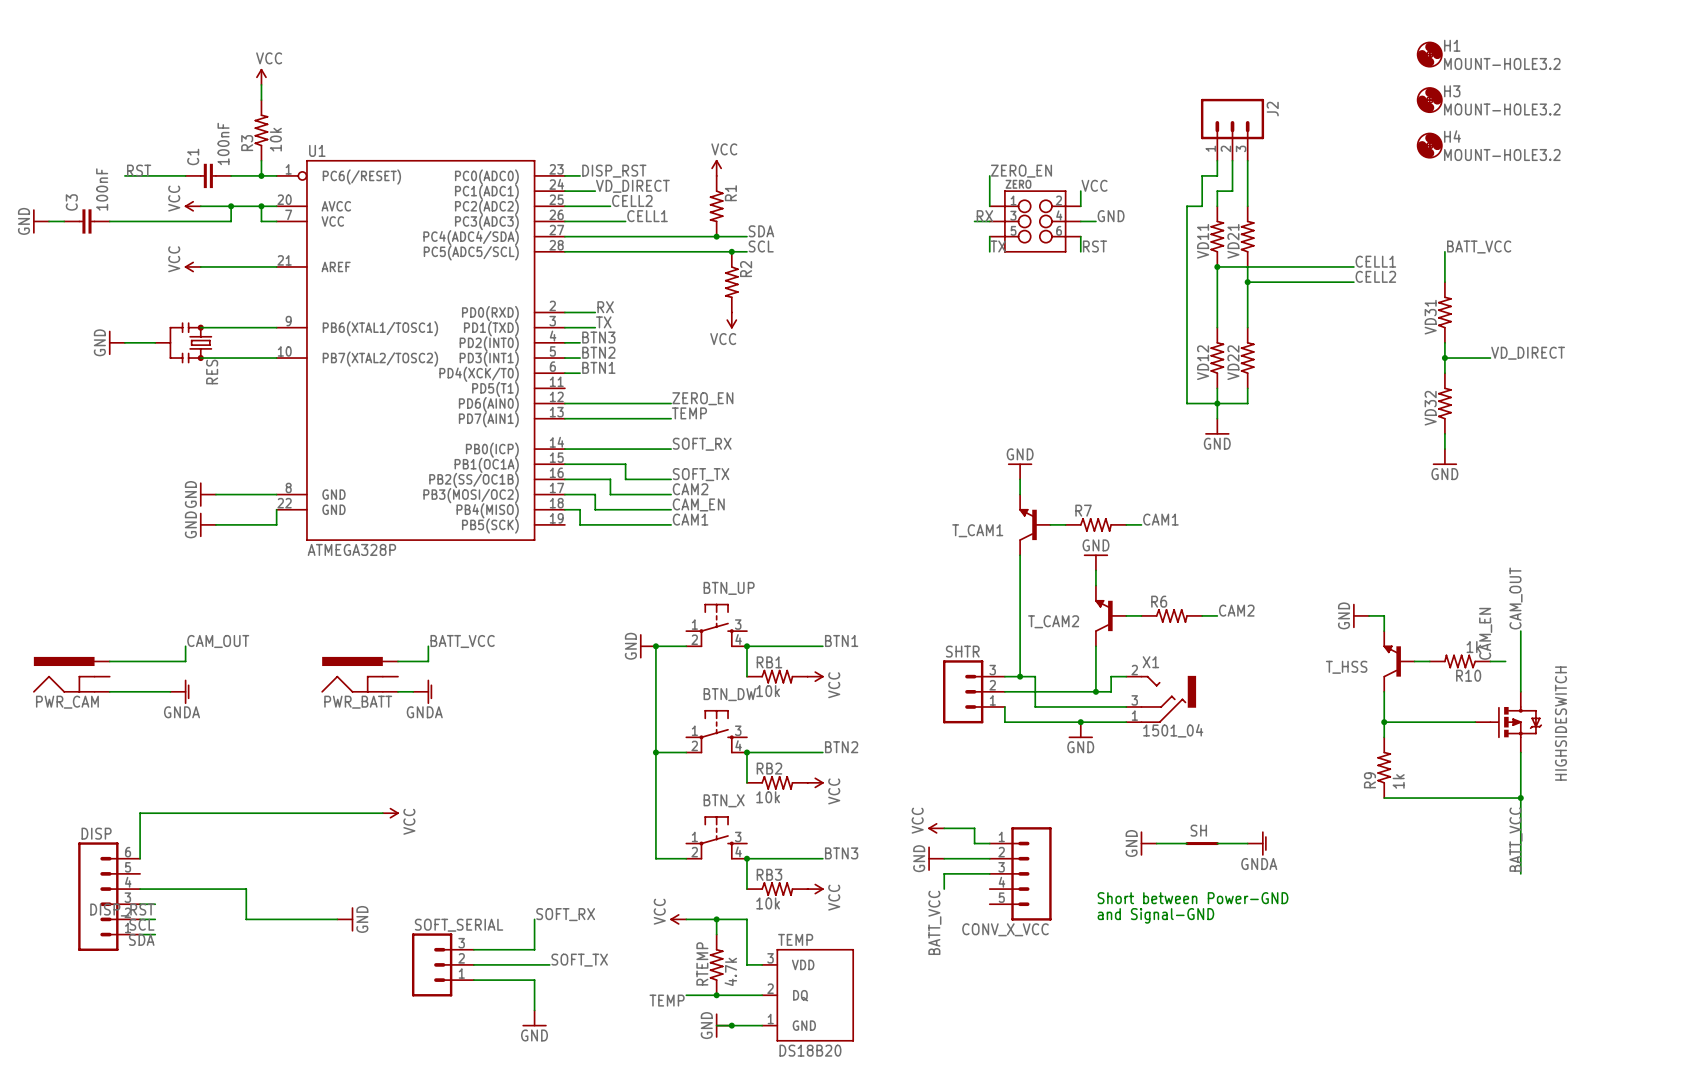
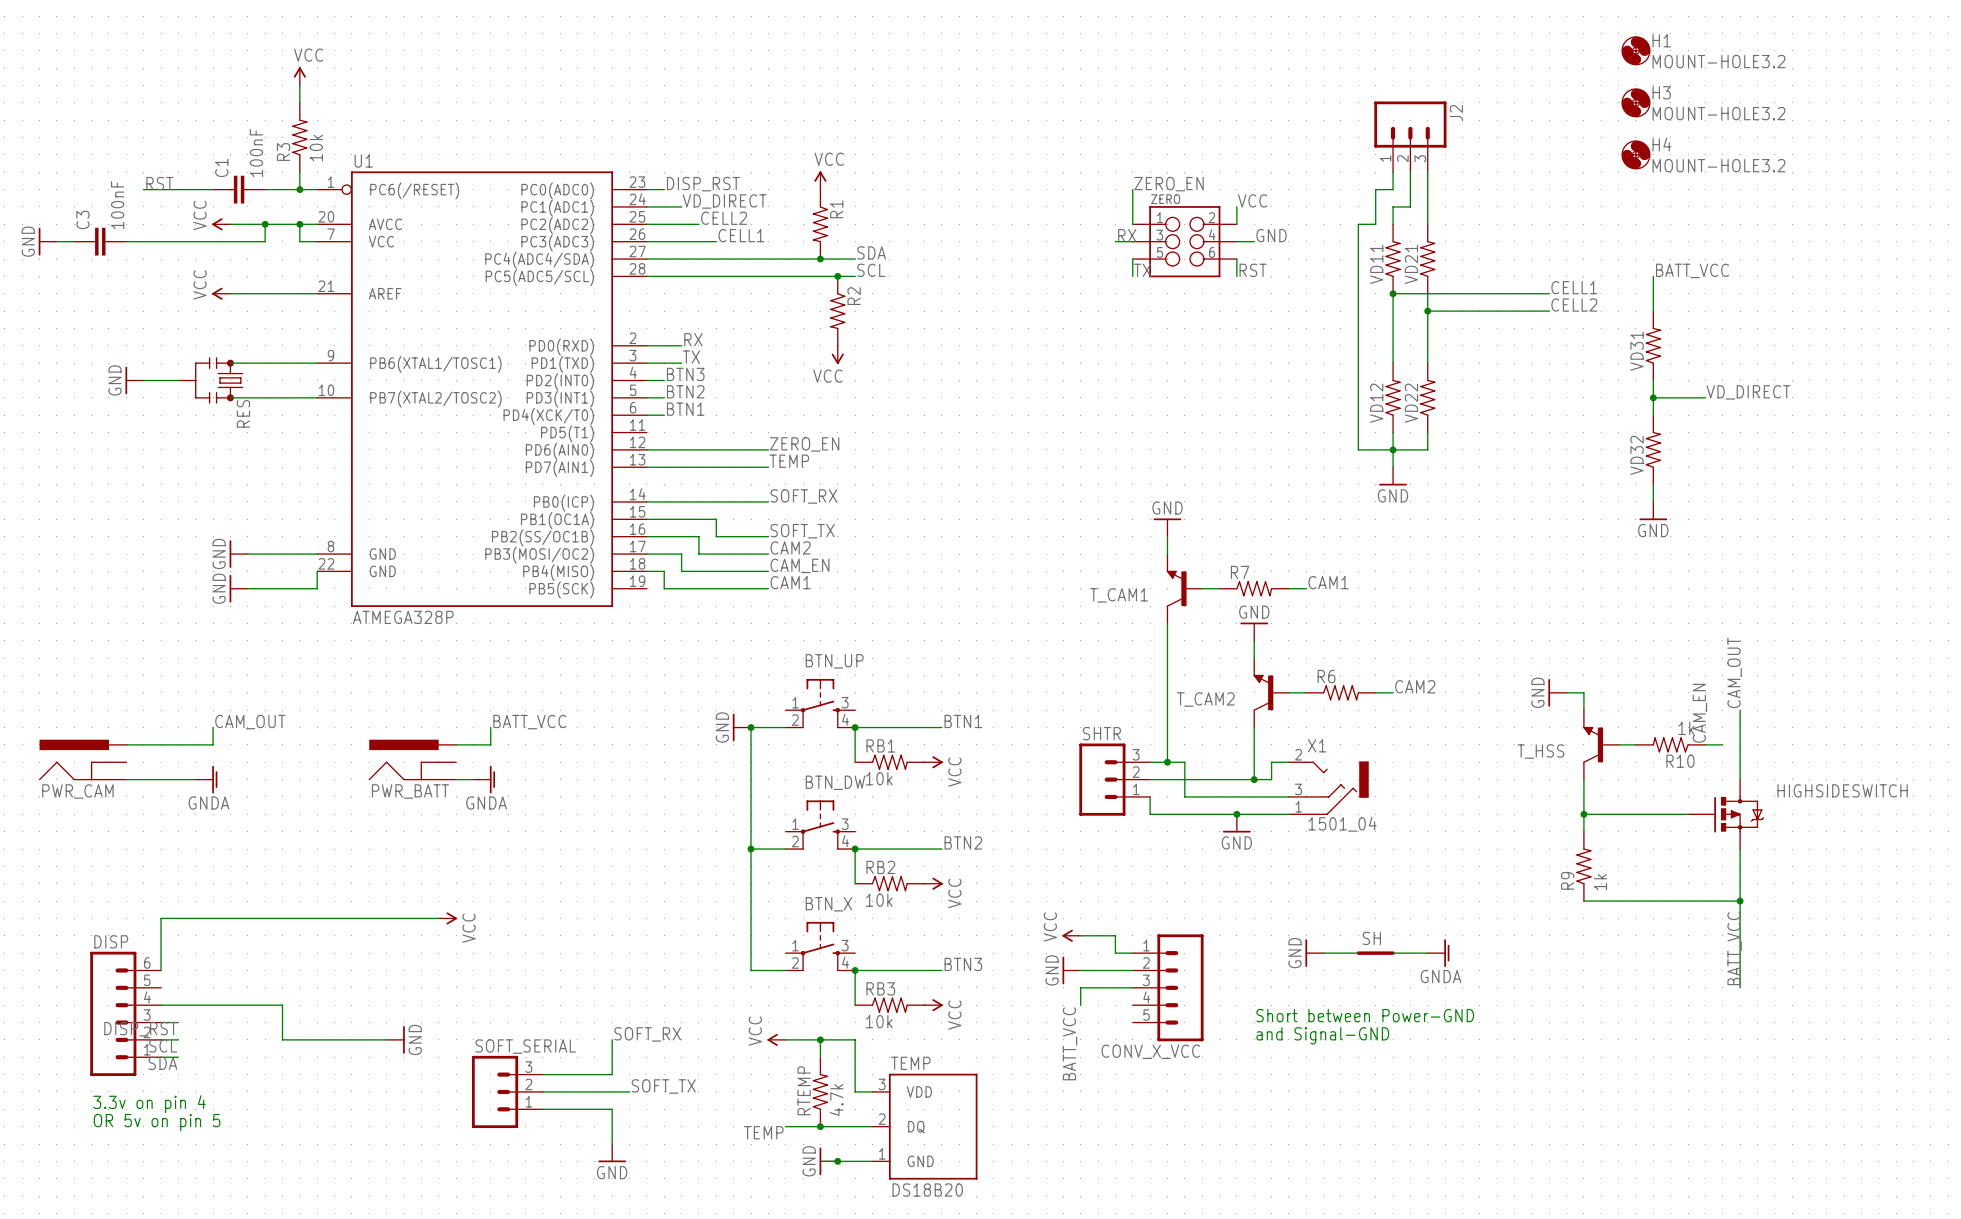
HIGHSIDESWITCH name rotation: 0° (1561, 723) -> 90° clockwise (1842, 790)
text: none -> 3.3v on pin 4 (149, 1104)
text: none -> OR 5v on pin 5 (157, 1122)

